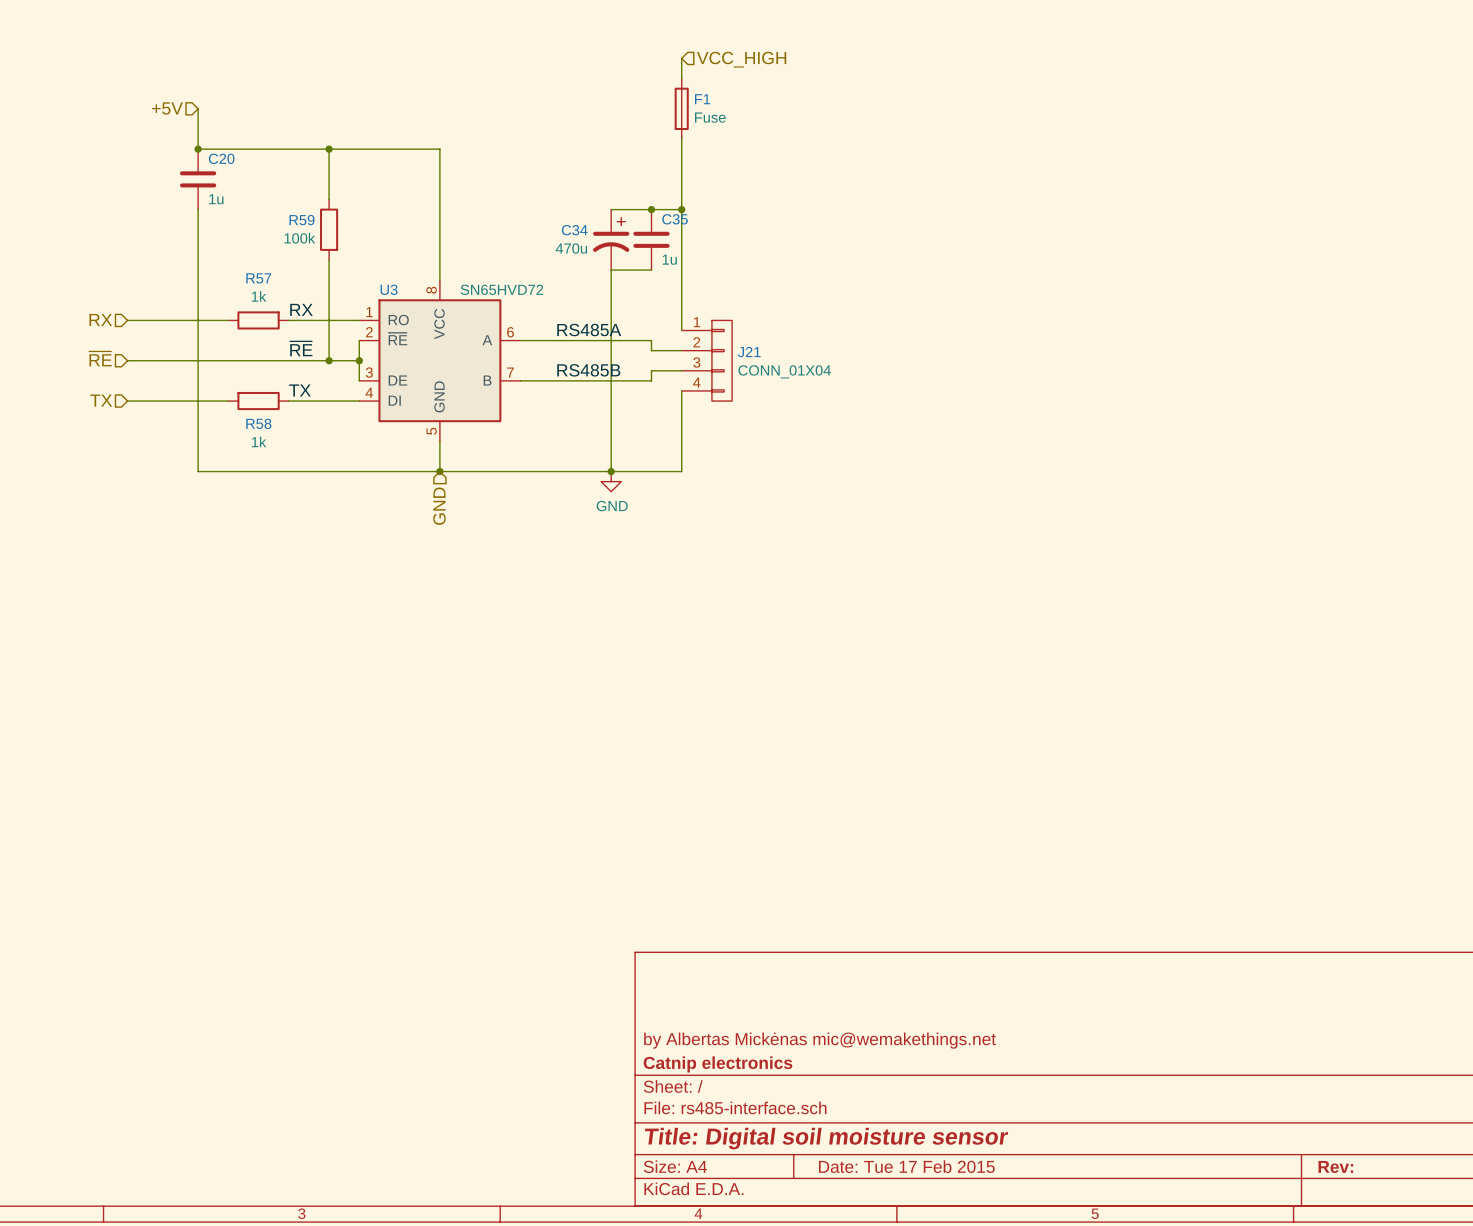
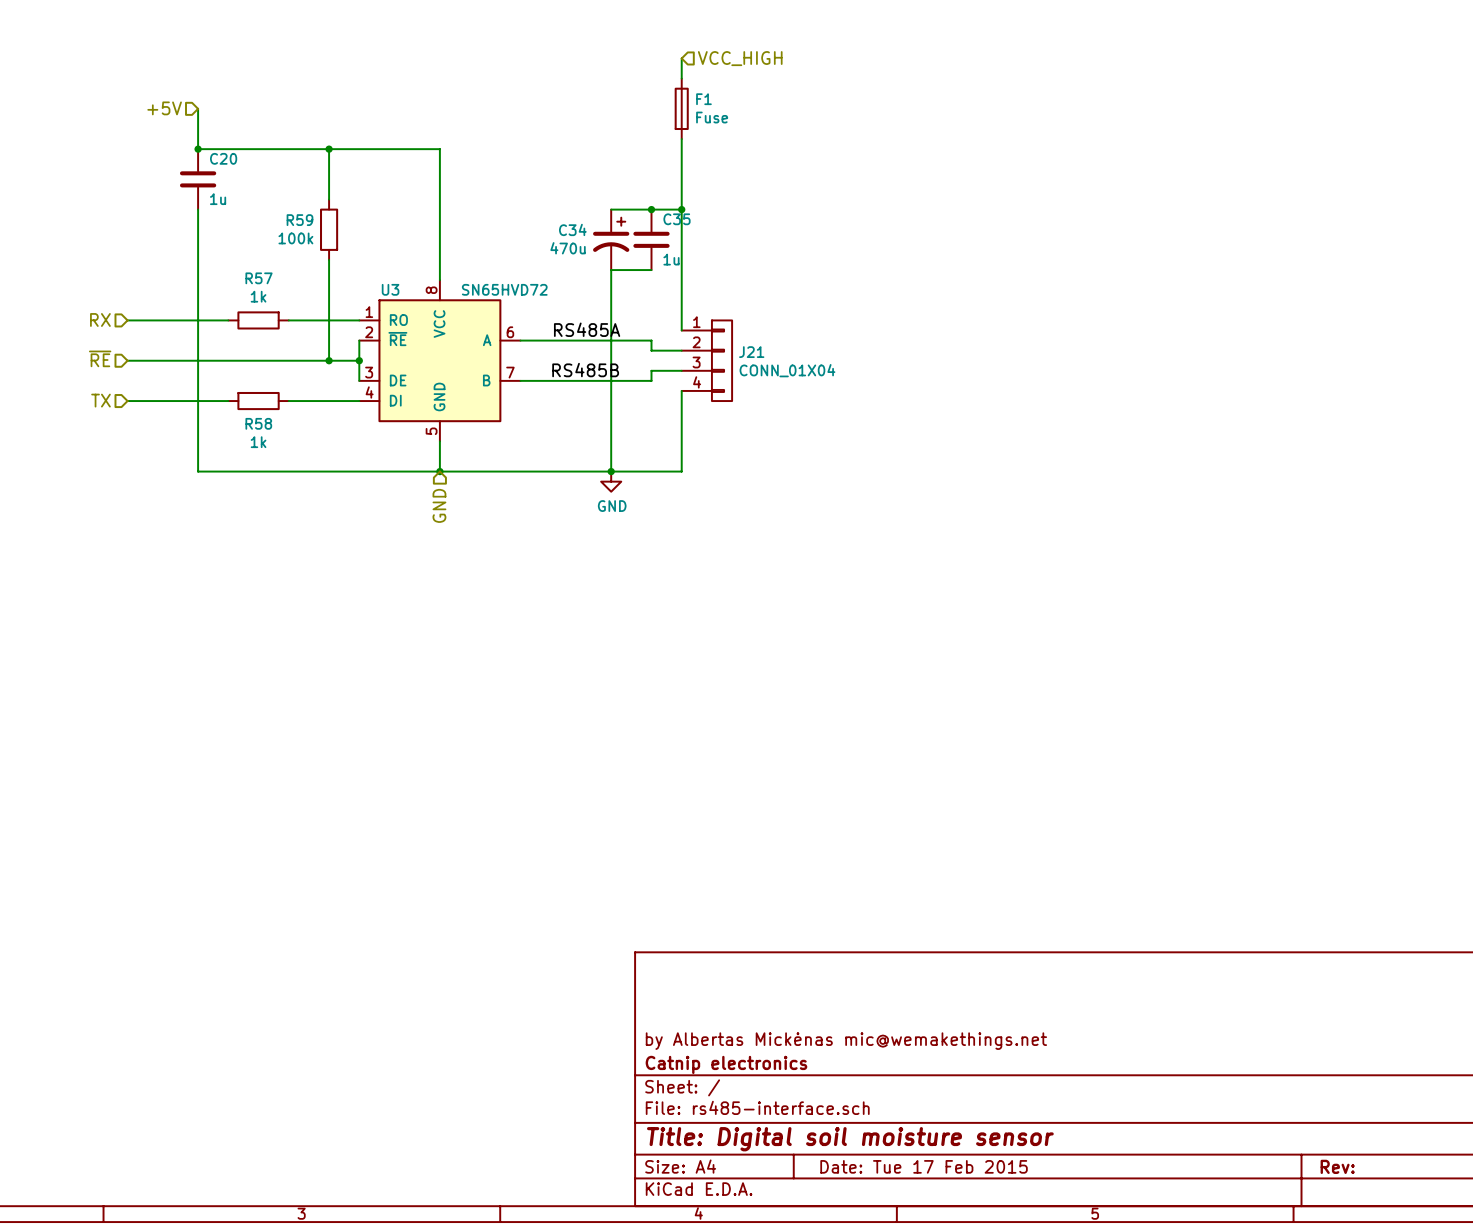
label: RX (301, 309) -> none
label: ~{RE} (301, 348) -> none
label: TX (300, 390) -> none

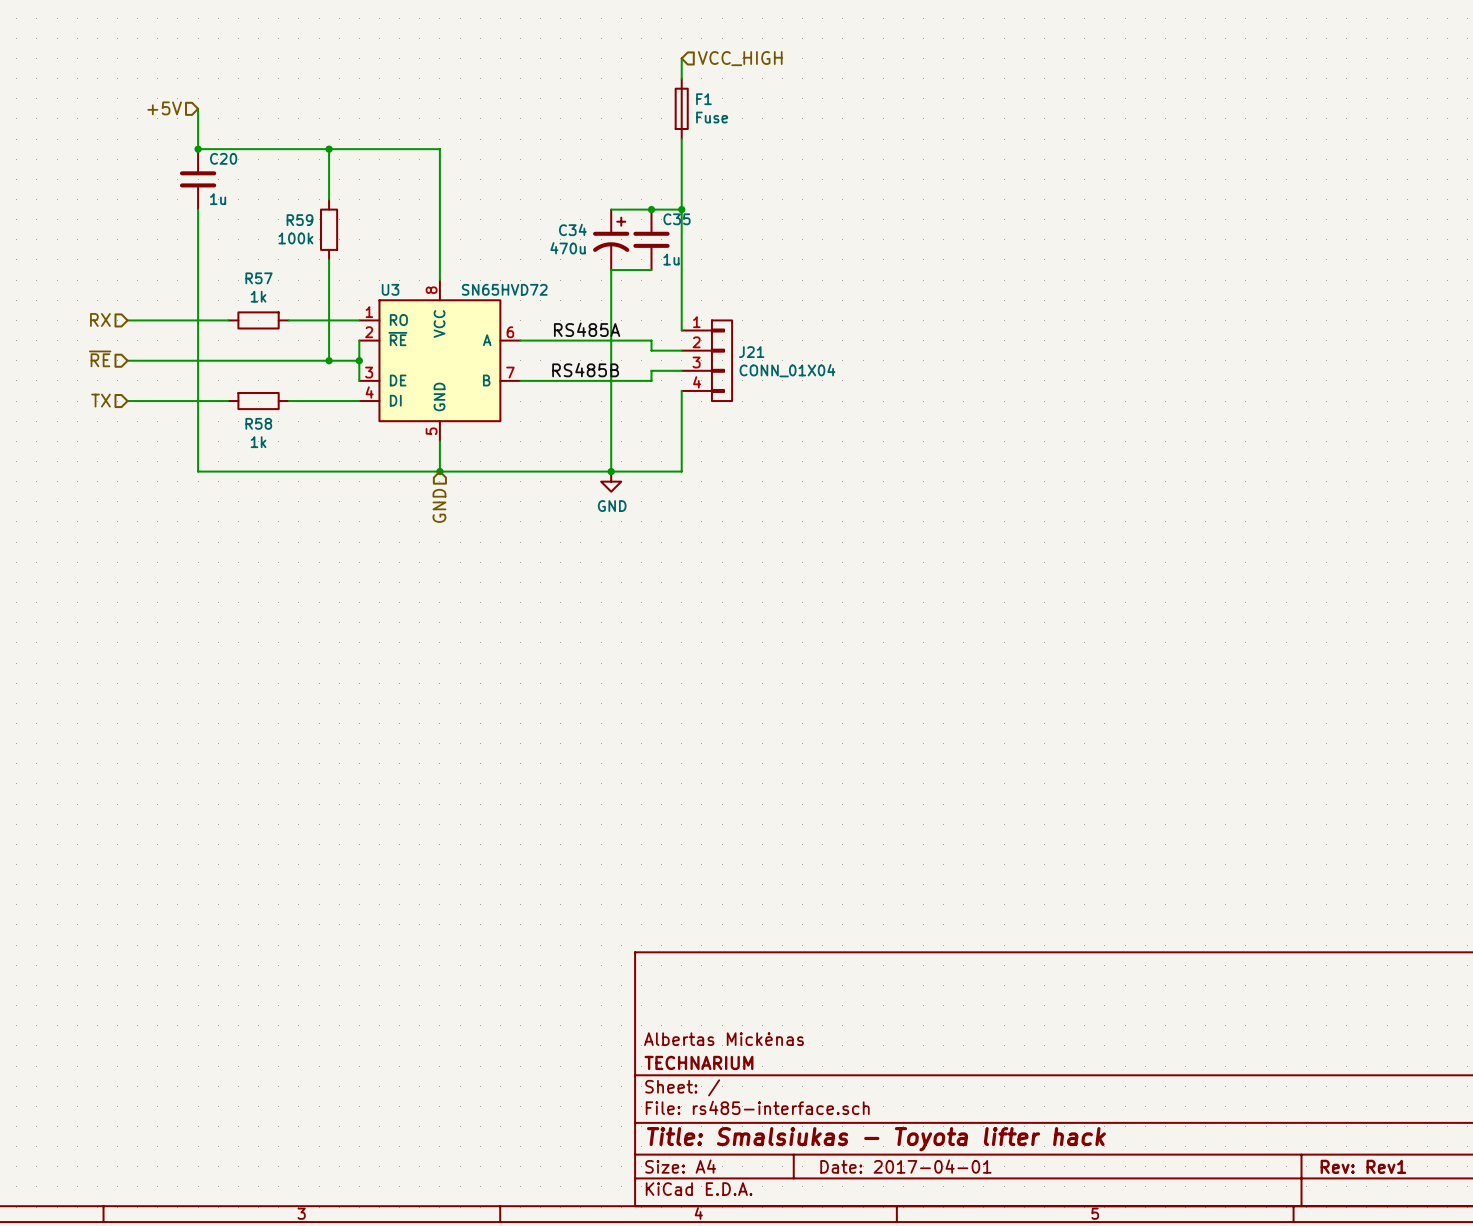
title block: by Albertas Mickėnas mic@wemakethings.net (846, 1041) -> Albertas Mickėnas (724, 1039)
title block: Catnip electronics (726, 1064) -> TECHNARIUM (698, 1062)
title block: Title: Digital soil moisture sensor (850, 1139) -> Title: Smalsiukas - Toyota lifter hack (876, 1139)
title block: Date: Tue 17 Feb 2015 (924, 1166) -> Date: 2017-04-01 (905, 1166)
title block: Rev: (1337, 1166) -> Rev: Rev1 (1363, 1166)

